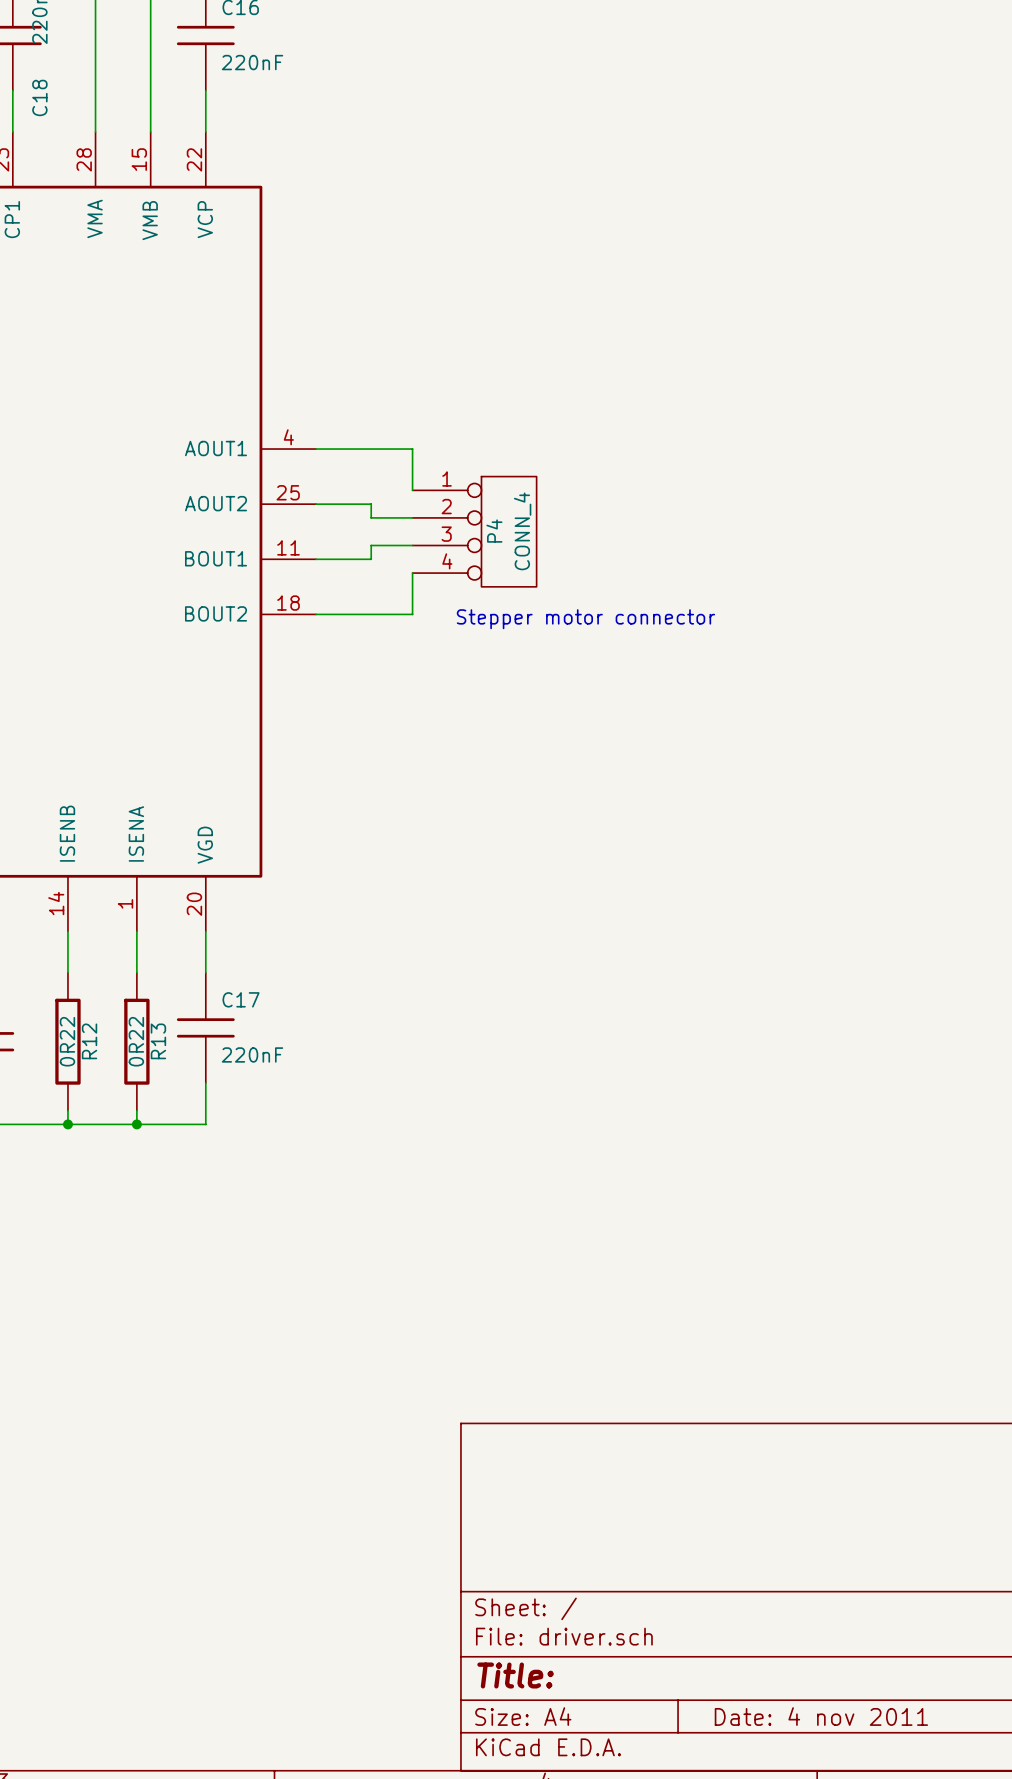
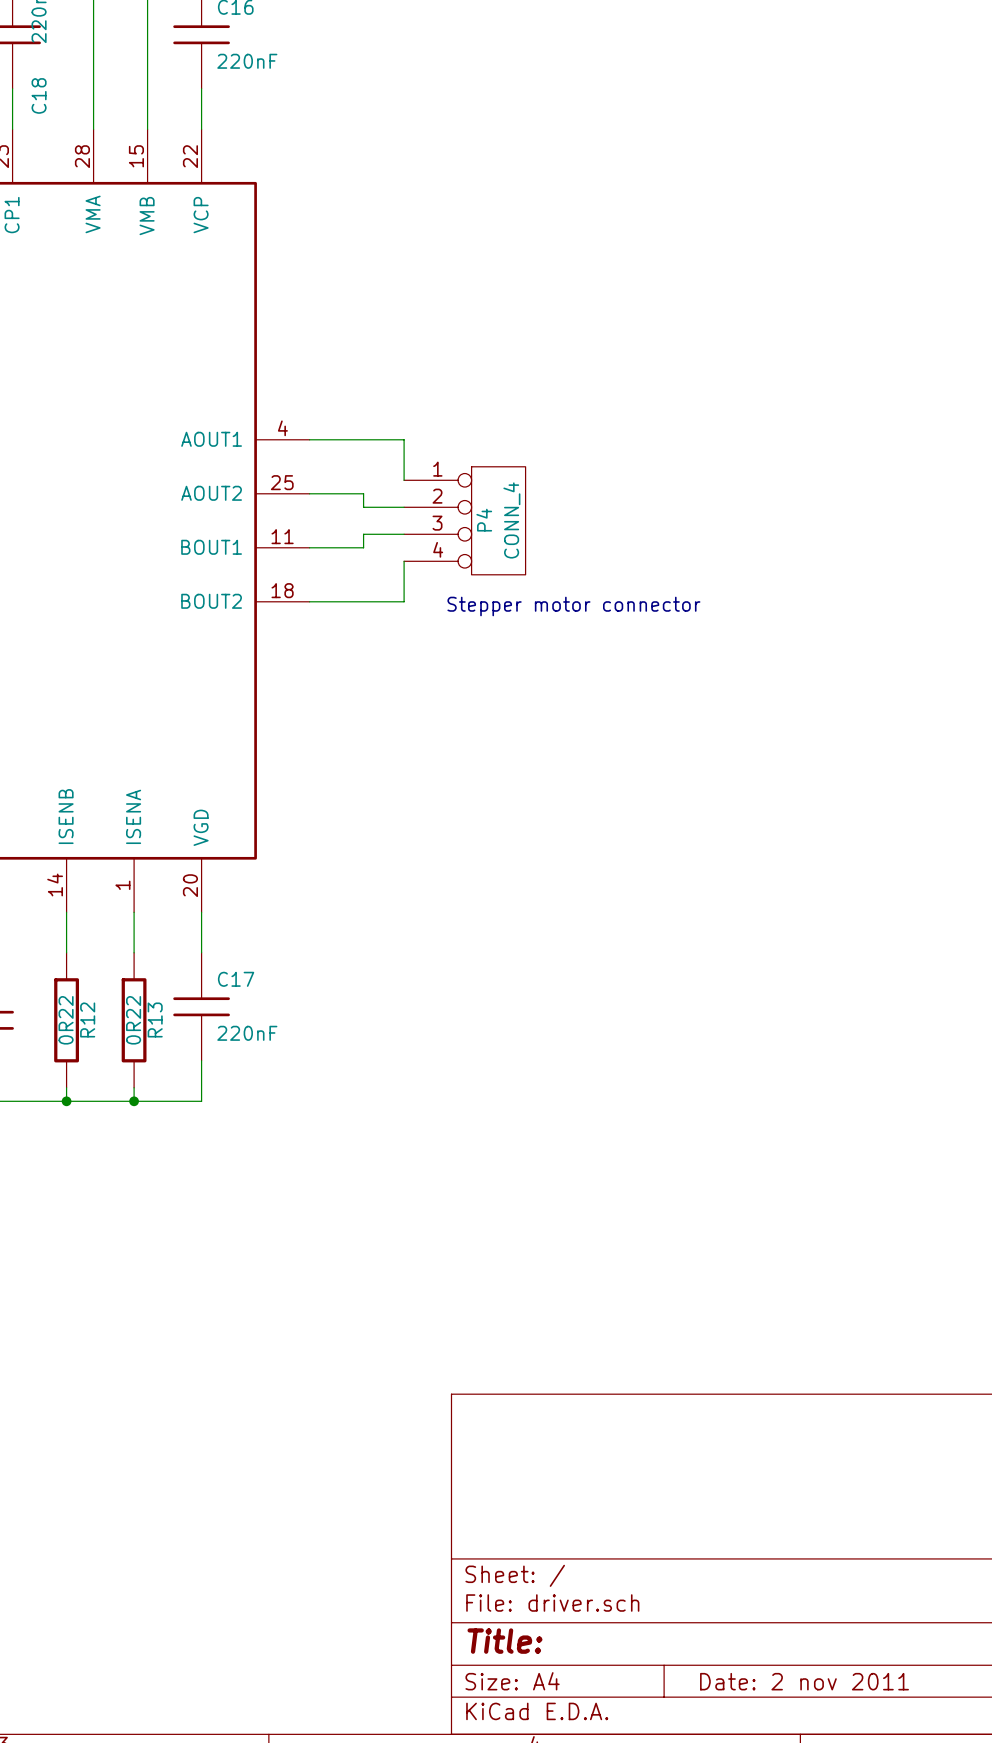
title block: Date: 4 nov 2011 (821, 1716) -> Date: 2 nov 2011 (804, 1681)

